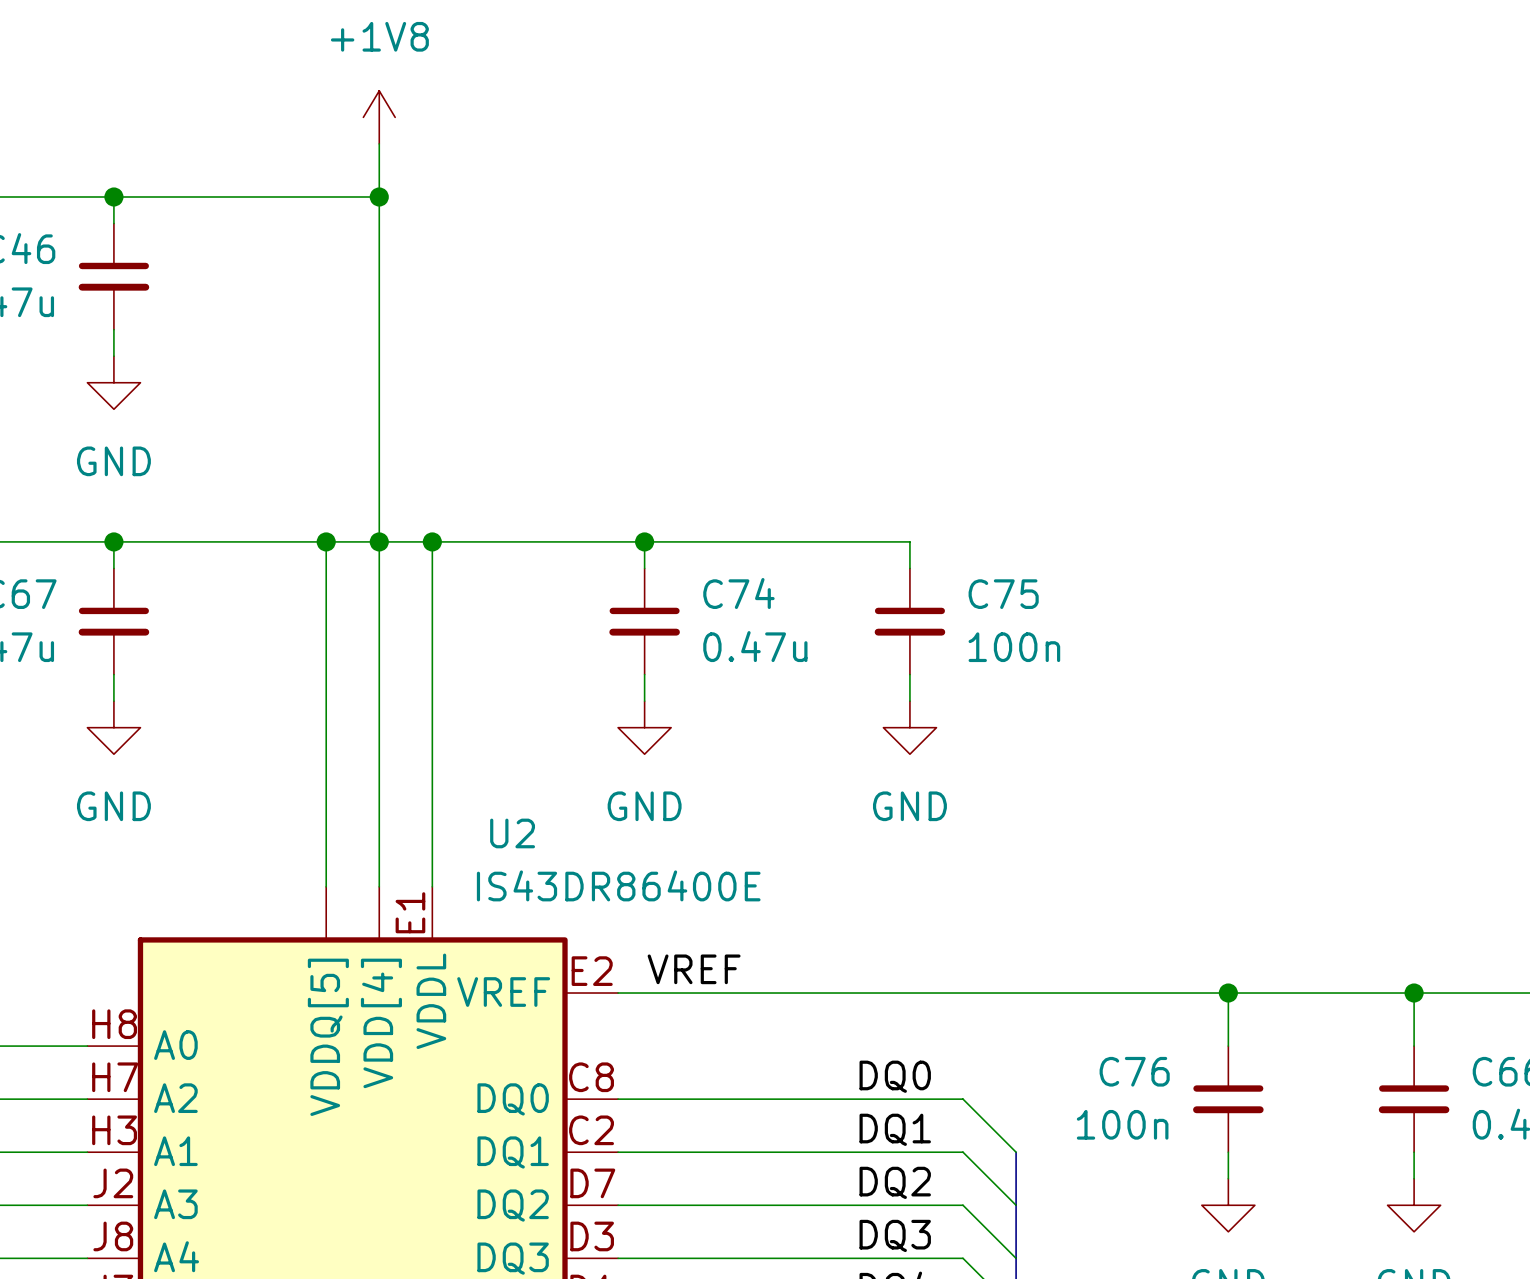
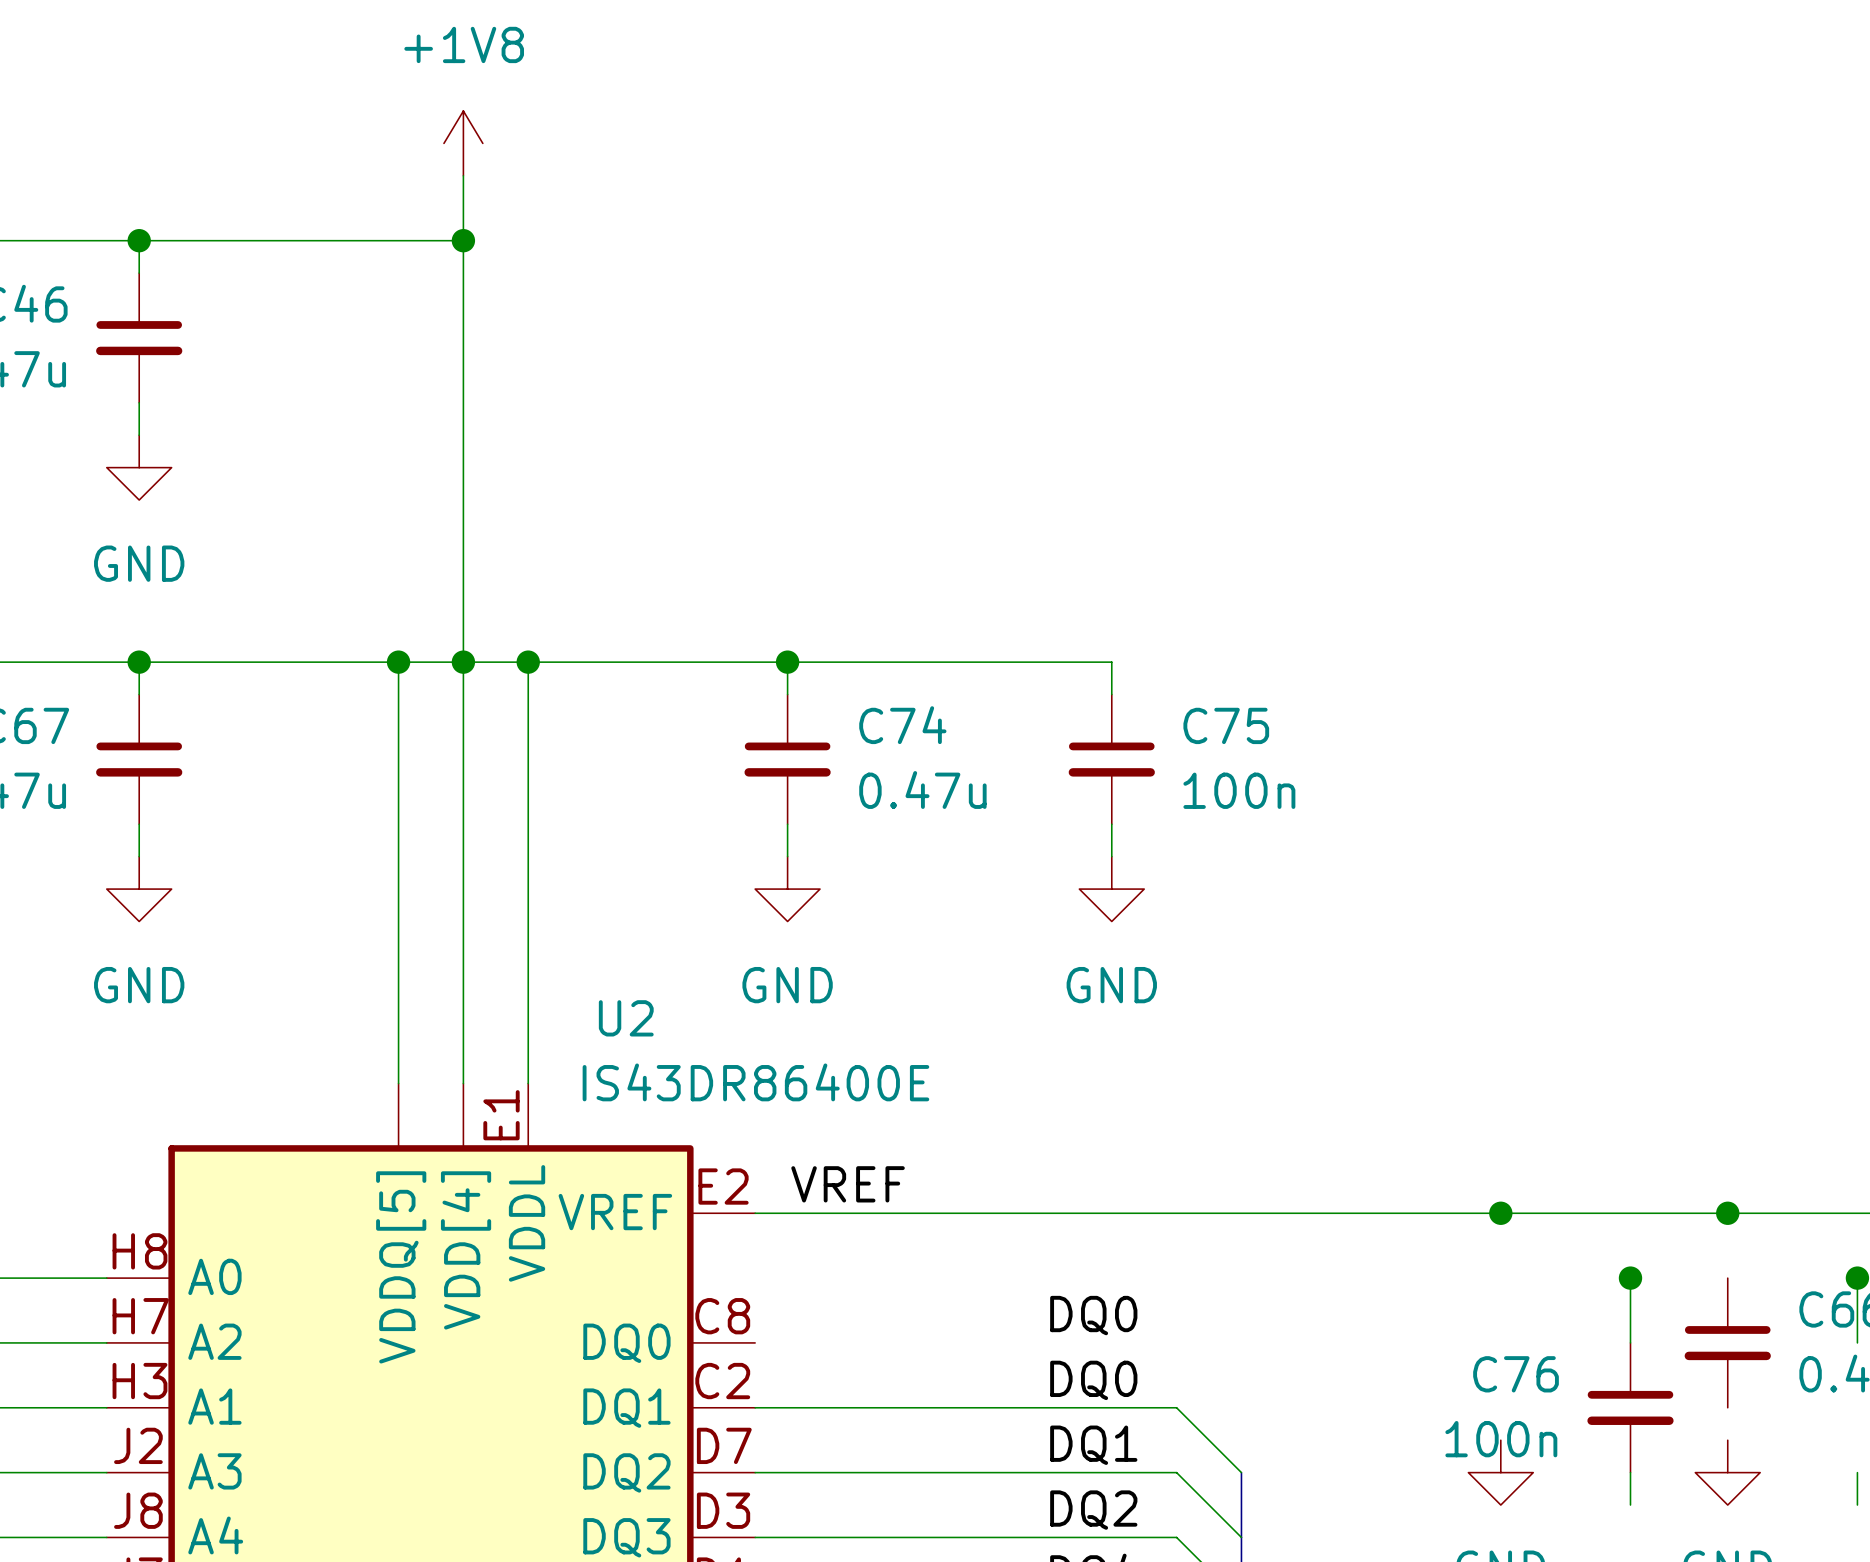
wire: (1228, 993) (1228, 1046) -> (1630, 1278) (1630, 1342)
wire: (1414, 993) (1414, 1046) -> (1857, 1278) (1857, 1342)
junction: none -> (1630, 1278)
junction: none -> (1857, 1278)
wire: (618, 1099) (963, 1099) (1016, 1152) -> none
C76 position: (1228, 1099) -> (1630, 1407)
label: DQ1 (895, 1129) -> DQ0 (1093, 1380)
bus: (1016, 1152) (1016, 1205) -> none
wire: (1228, 1152) (1228, 1178) -> (1630, 1472) (1630, 1505)
wire: (1414, 1152) (1414, 1178) -> (1857, 1472) (1857, 1505)
label: DQ2 (895, 1182) -> DQ1 (1093, 1445)
label: DQ3 (895, 1235) -> DQ2 (1093, 1510)

